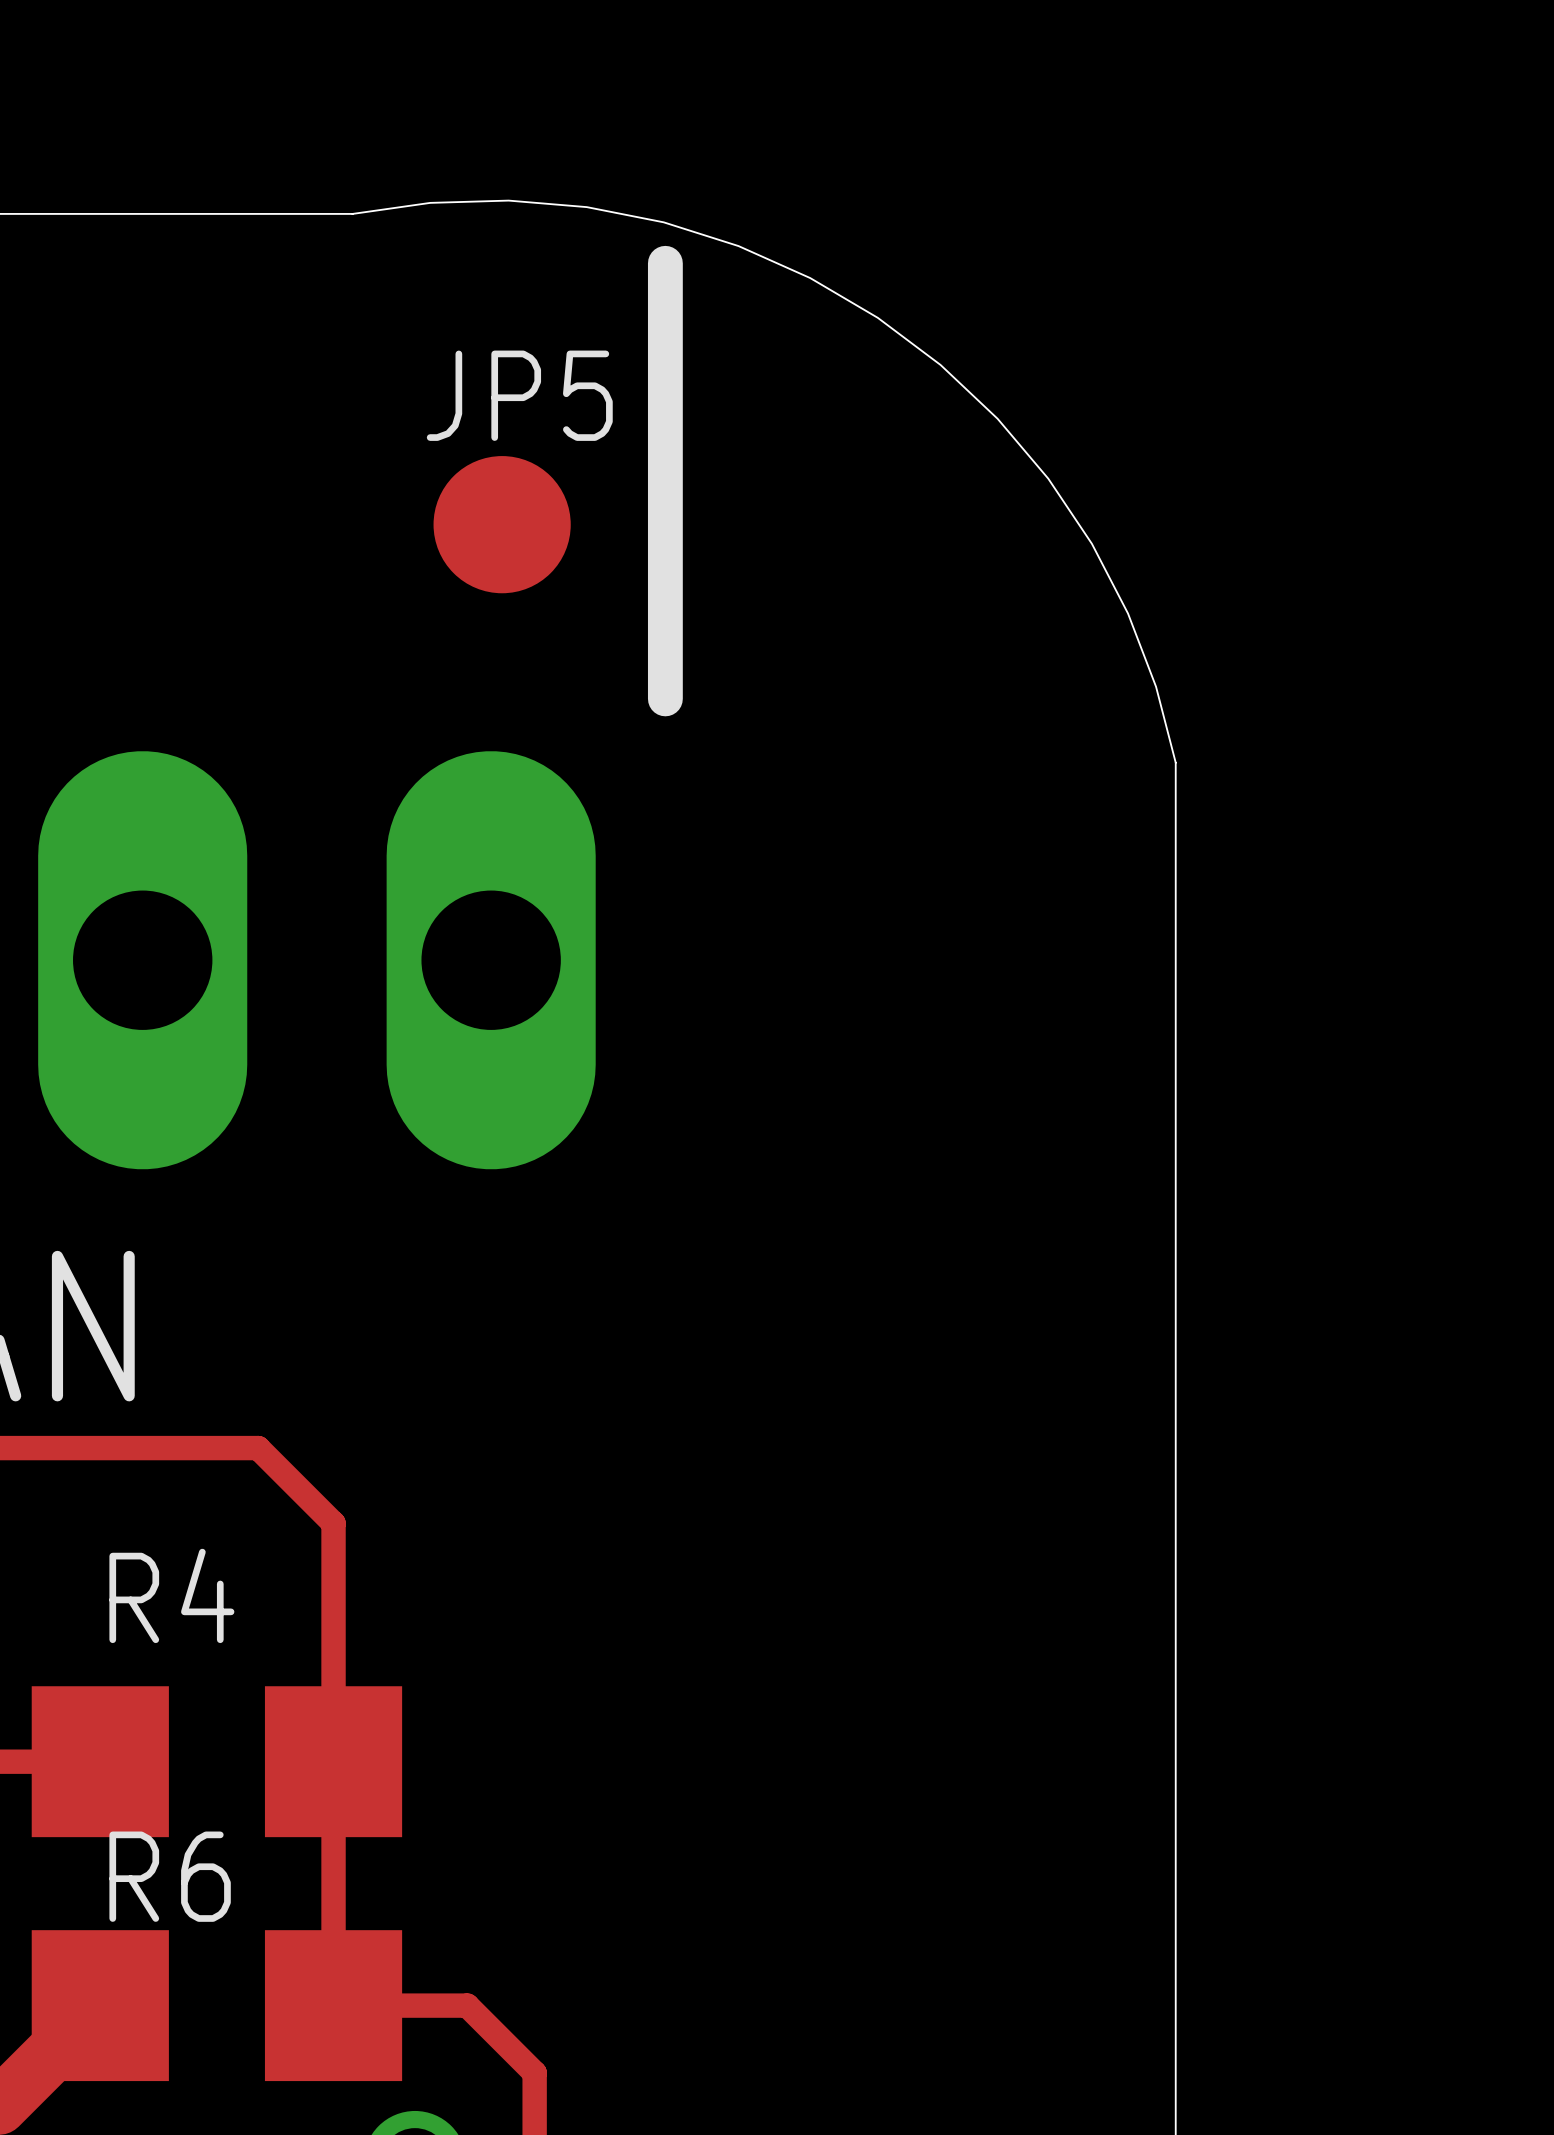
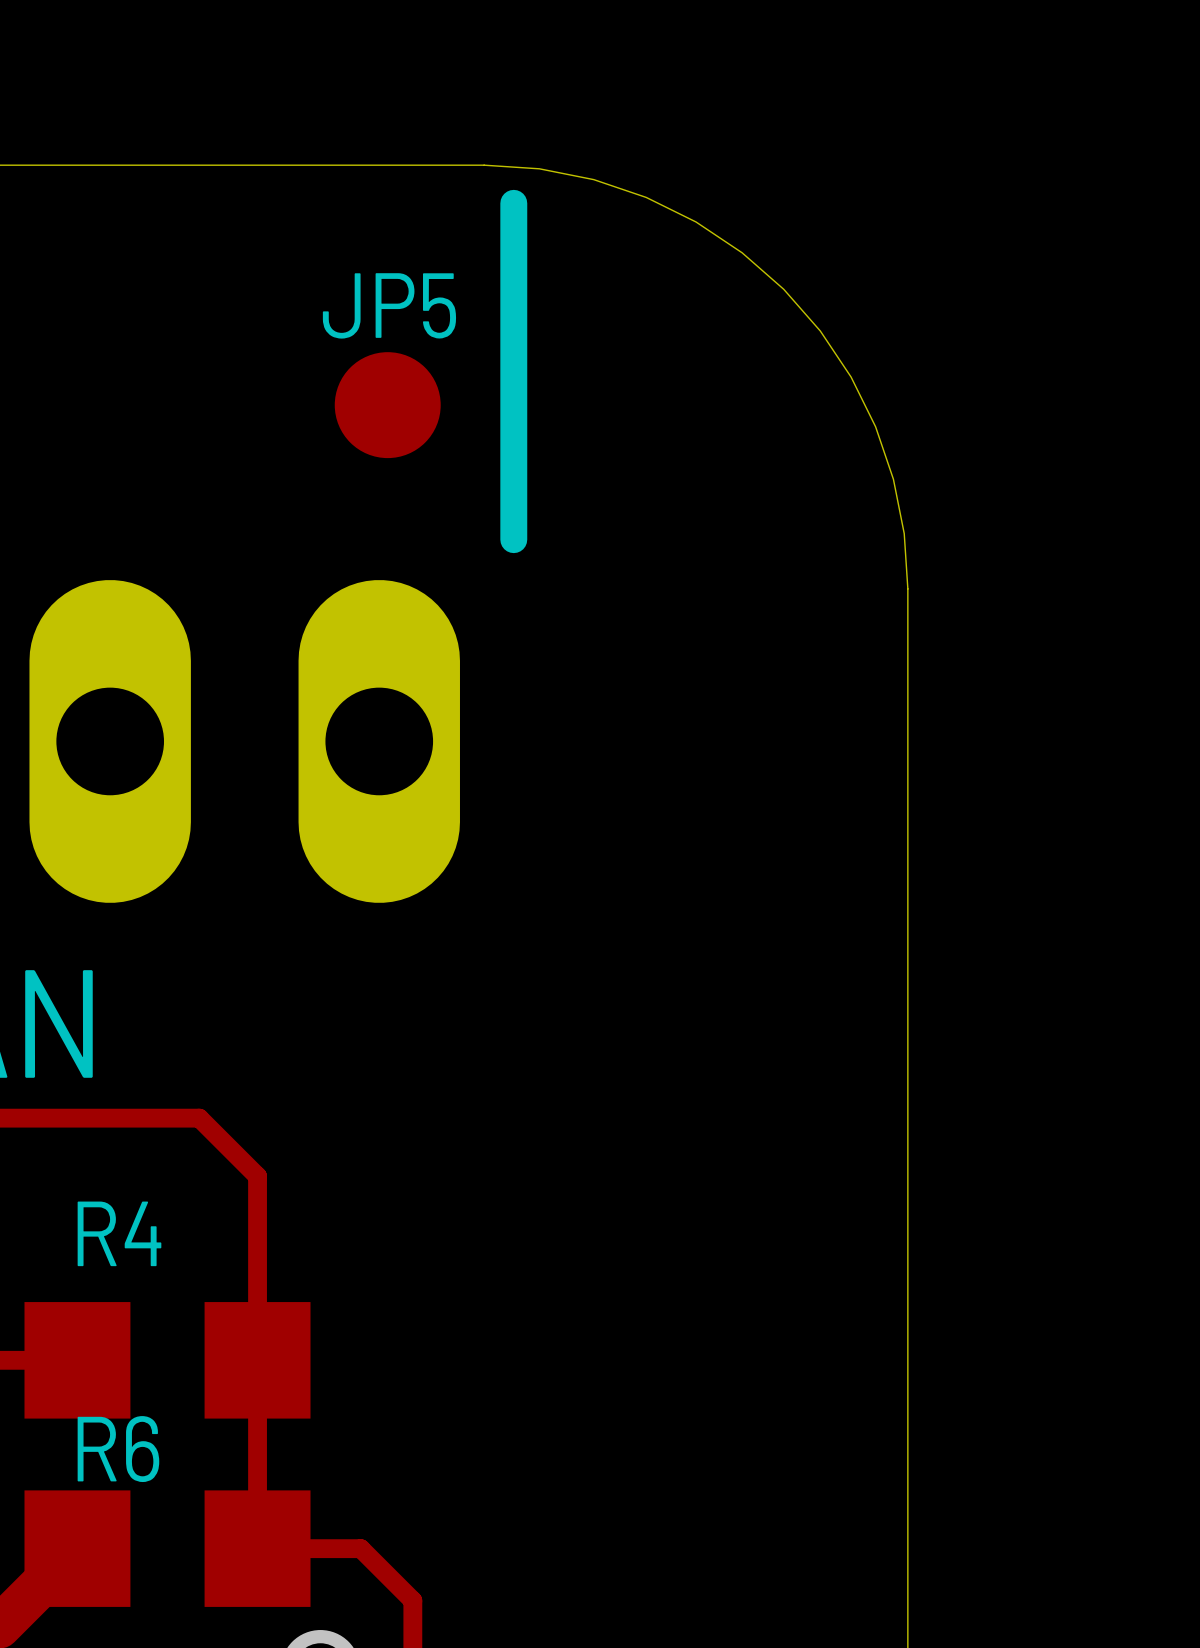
board edge: (352, 213) (430, 202) (508, 200) (586, 207) (663, 222) (738, 246) (810, 278) (877, 317) (940, 364) (997, 418) (1048, 478) (1091, 543) (1128, 613) (1156, 686) (1175, 762) -> (272, 165) (484, 165) (539, 168) (593, 179) (646, 197) (695, 221) (742, 252) (783, 289) (820, 330) (851, 377) (875, 426) (893, 479) (904, 533) (907, 588)

